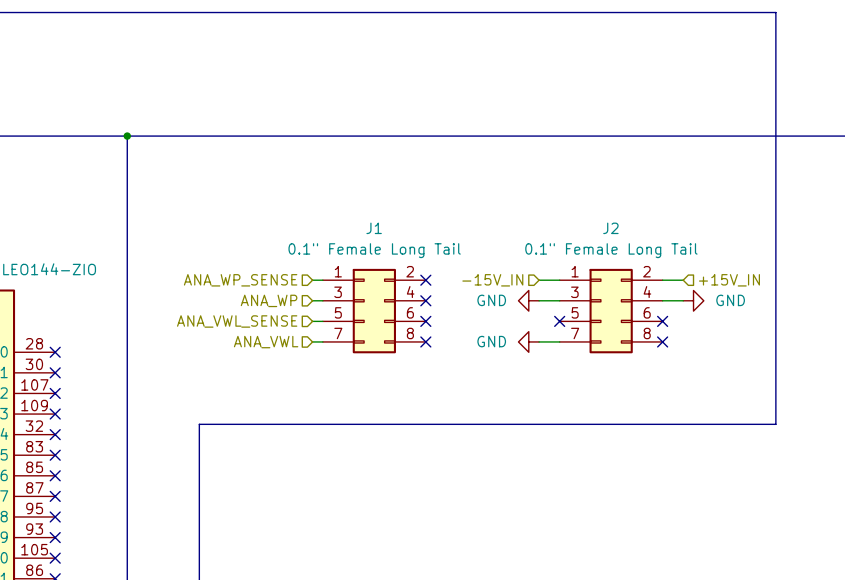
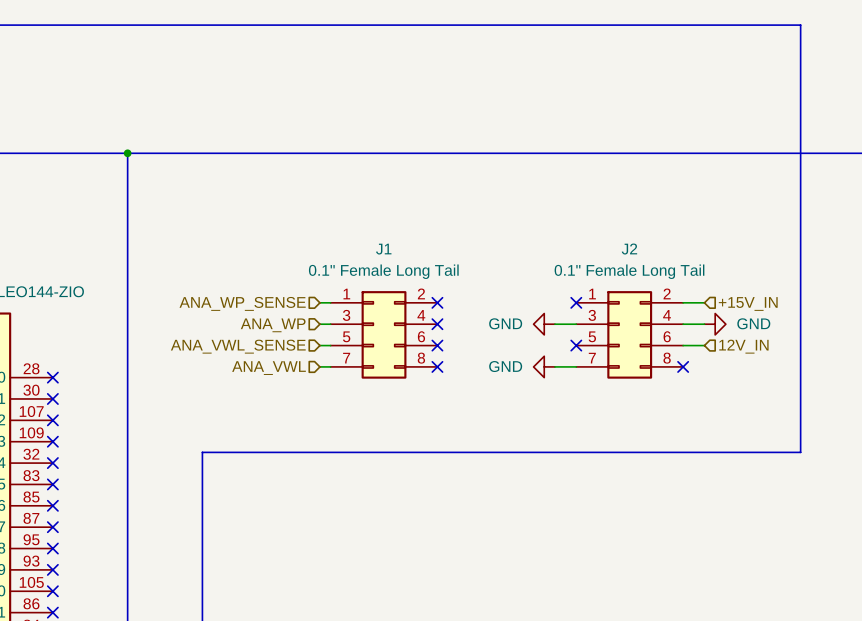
hierarchical label: -15V_IN (492, 280) -> none
wire: (539, 280) (559, 280) -> (683, 345) (704, 345)
no-connect mark: none -> (576, 302)
no-connect mark: (662, 321) -> none
hierarchical label: none -> 12V_IN (743, 346)

